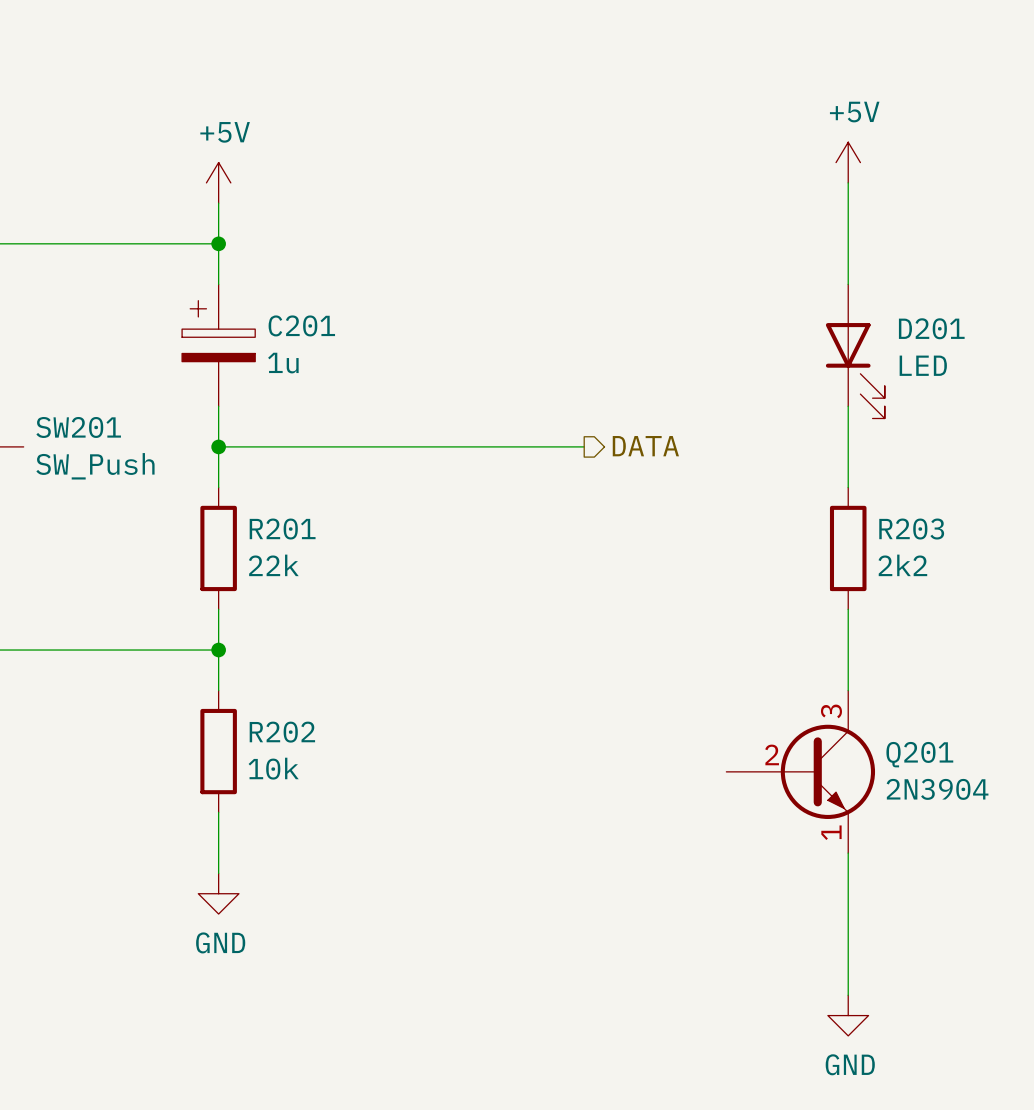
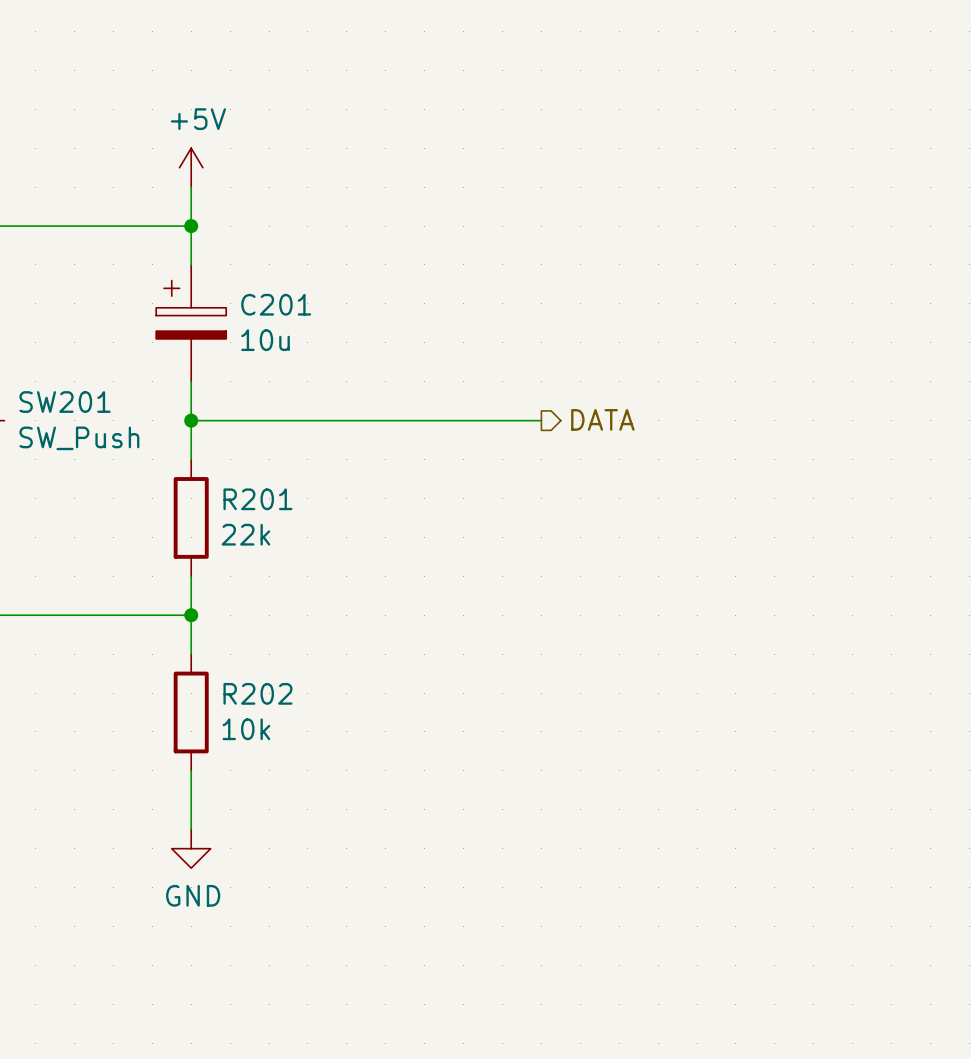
power symbol: +5V (848, 162) -> none
wire: (848, 182) (848, 284) -> none
D201: LED (855, 351) -> none
C201 value: 1u (283, 363) -> 10u (265, 340)
wire: (848, 406) (848, 487) -> none
R203: 2k2 (848, 548) -> none
wire: (848, 609) (848, 690) -> none
Q201: 2N3904 (800, 771) -> none
wire: (848, 853) (848, 995) -> none
power symbol: GND (848, 1015) -> none

